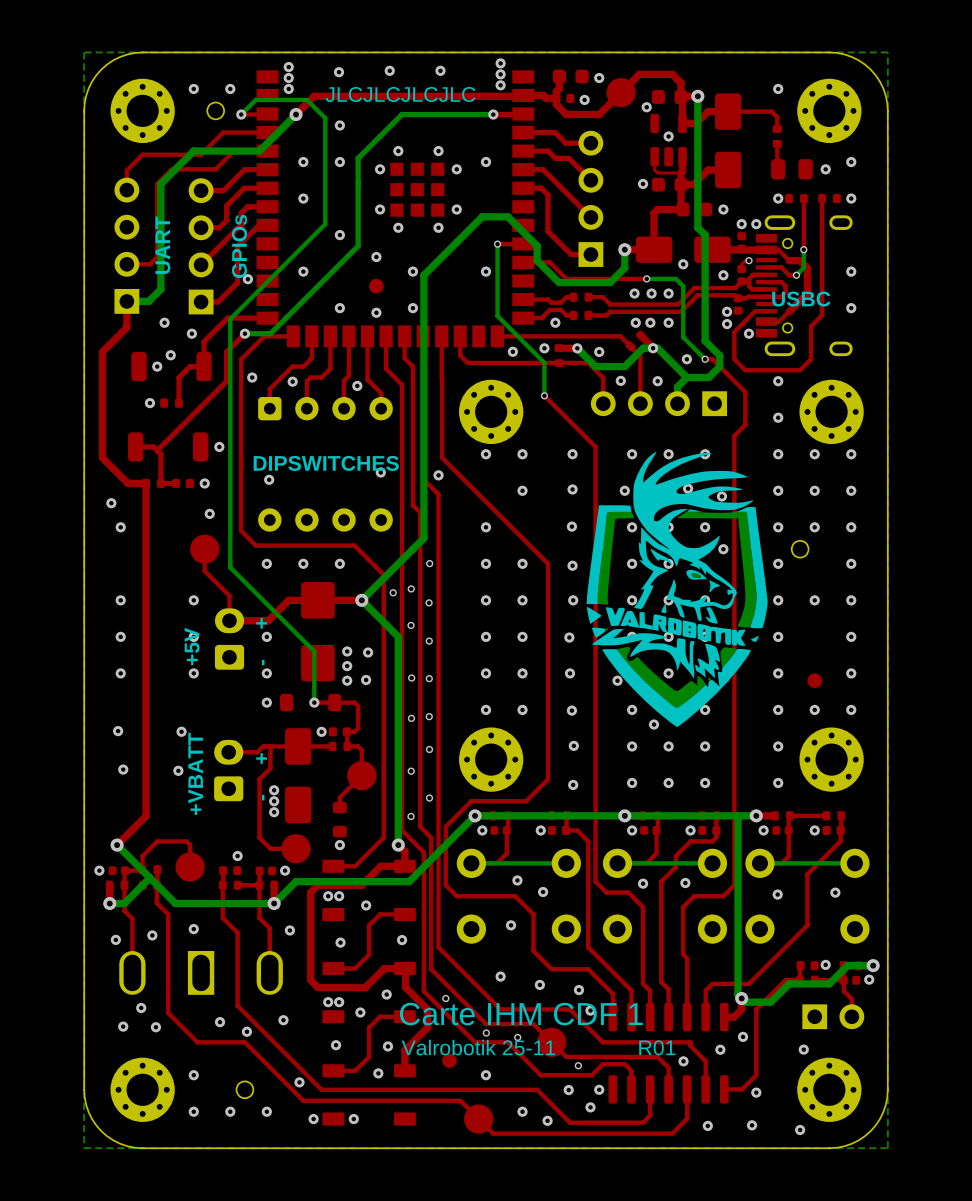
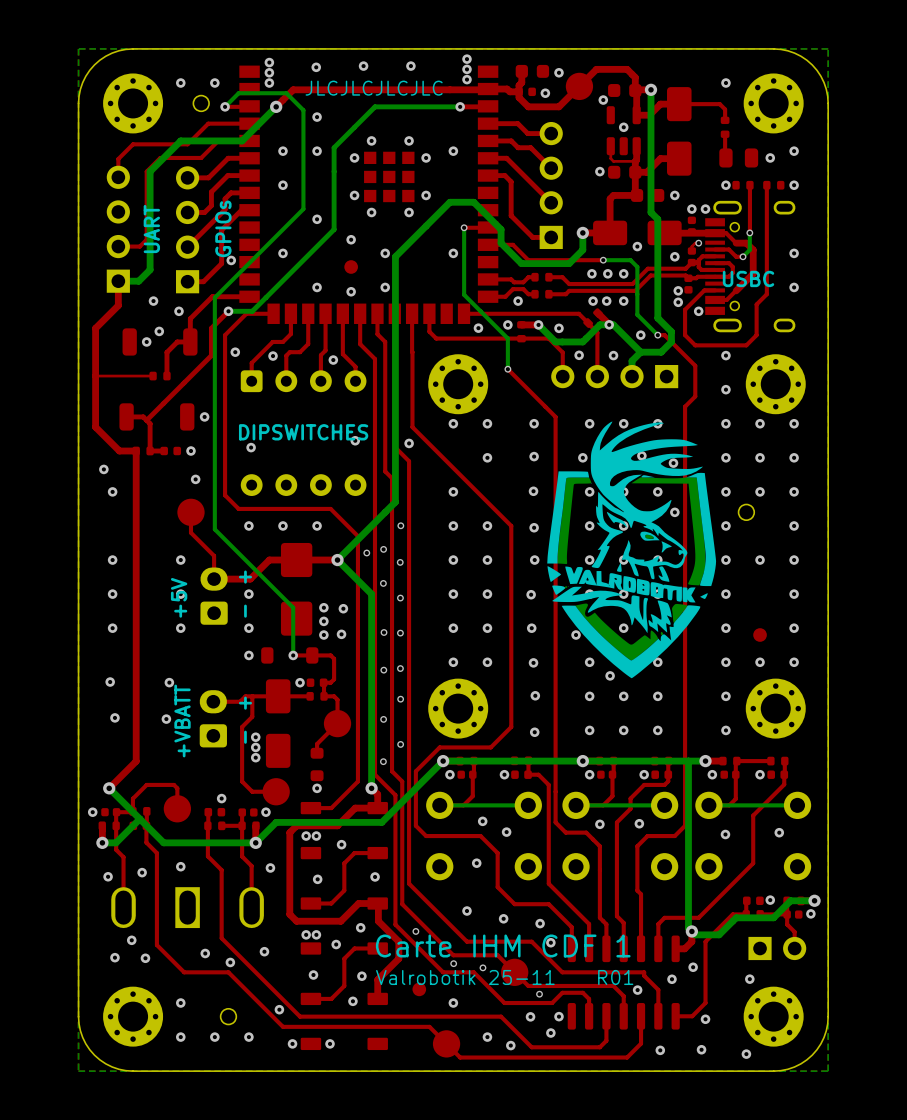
via: (149, 403) -> none
top track: none -> (153, 376) (95, 376)

